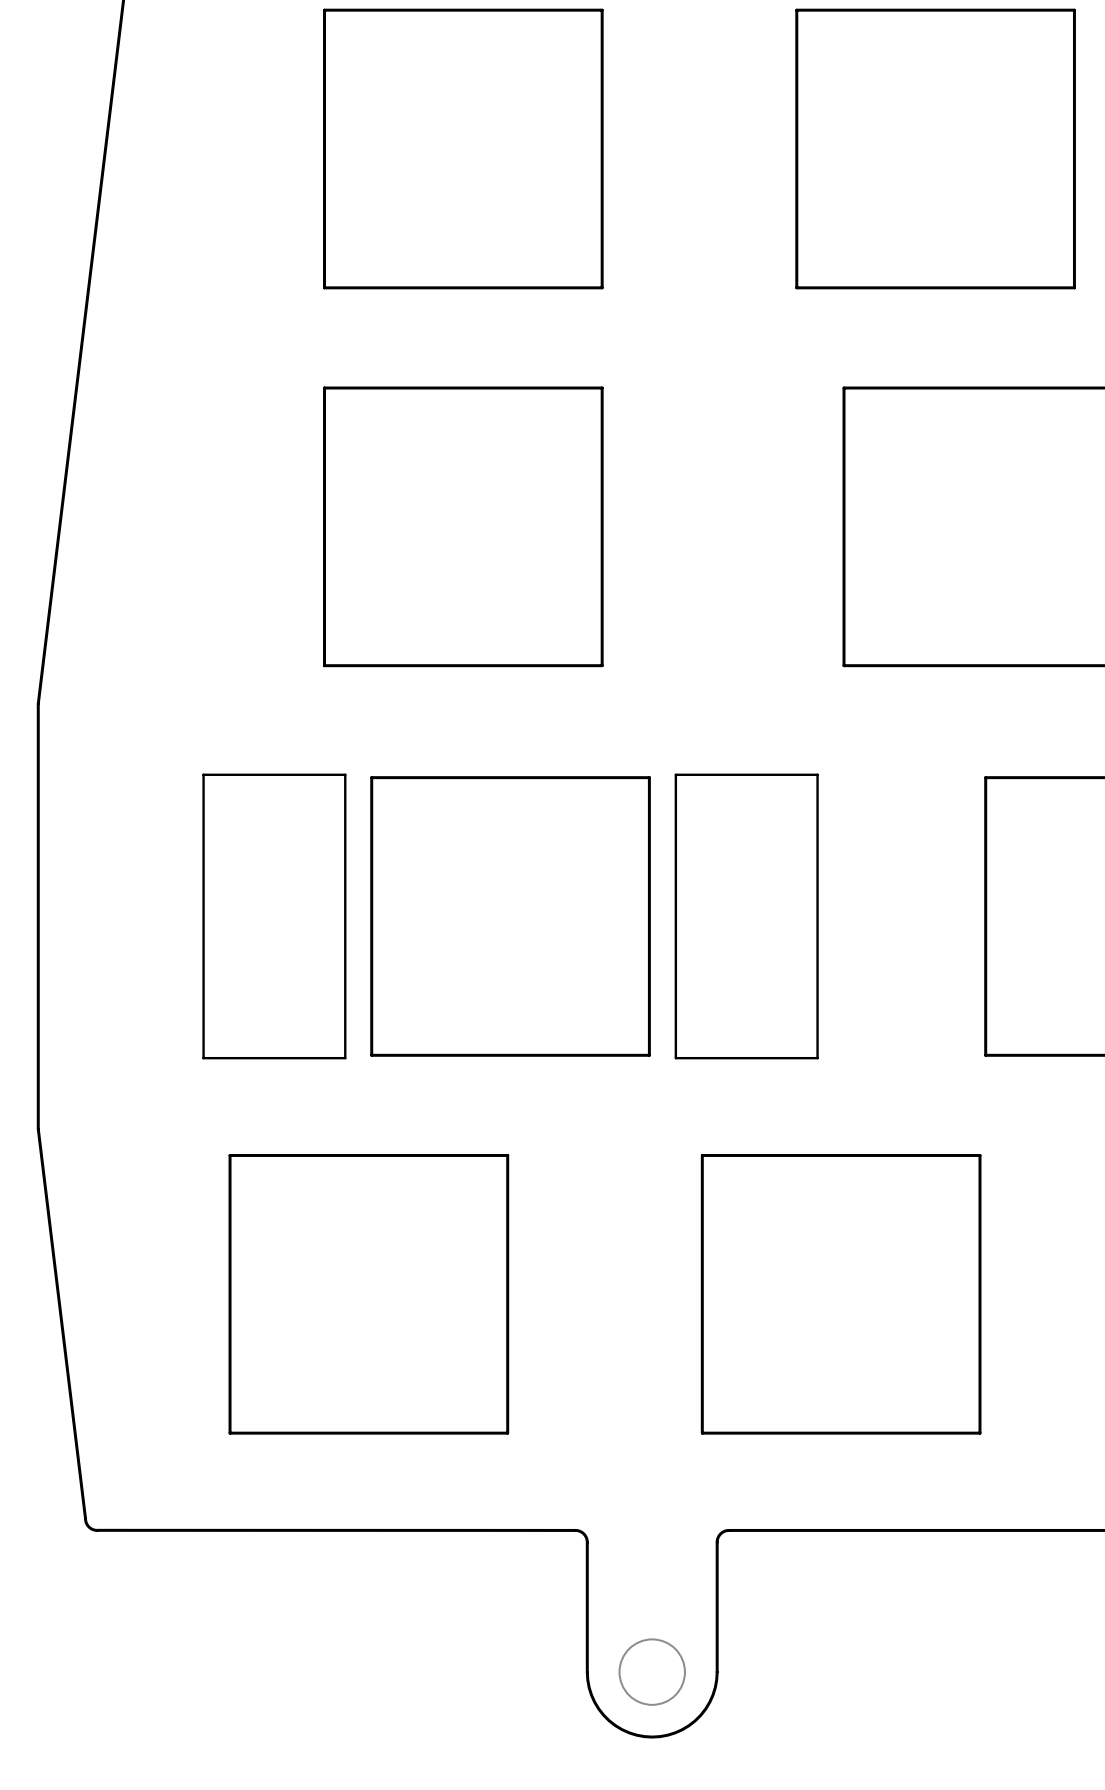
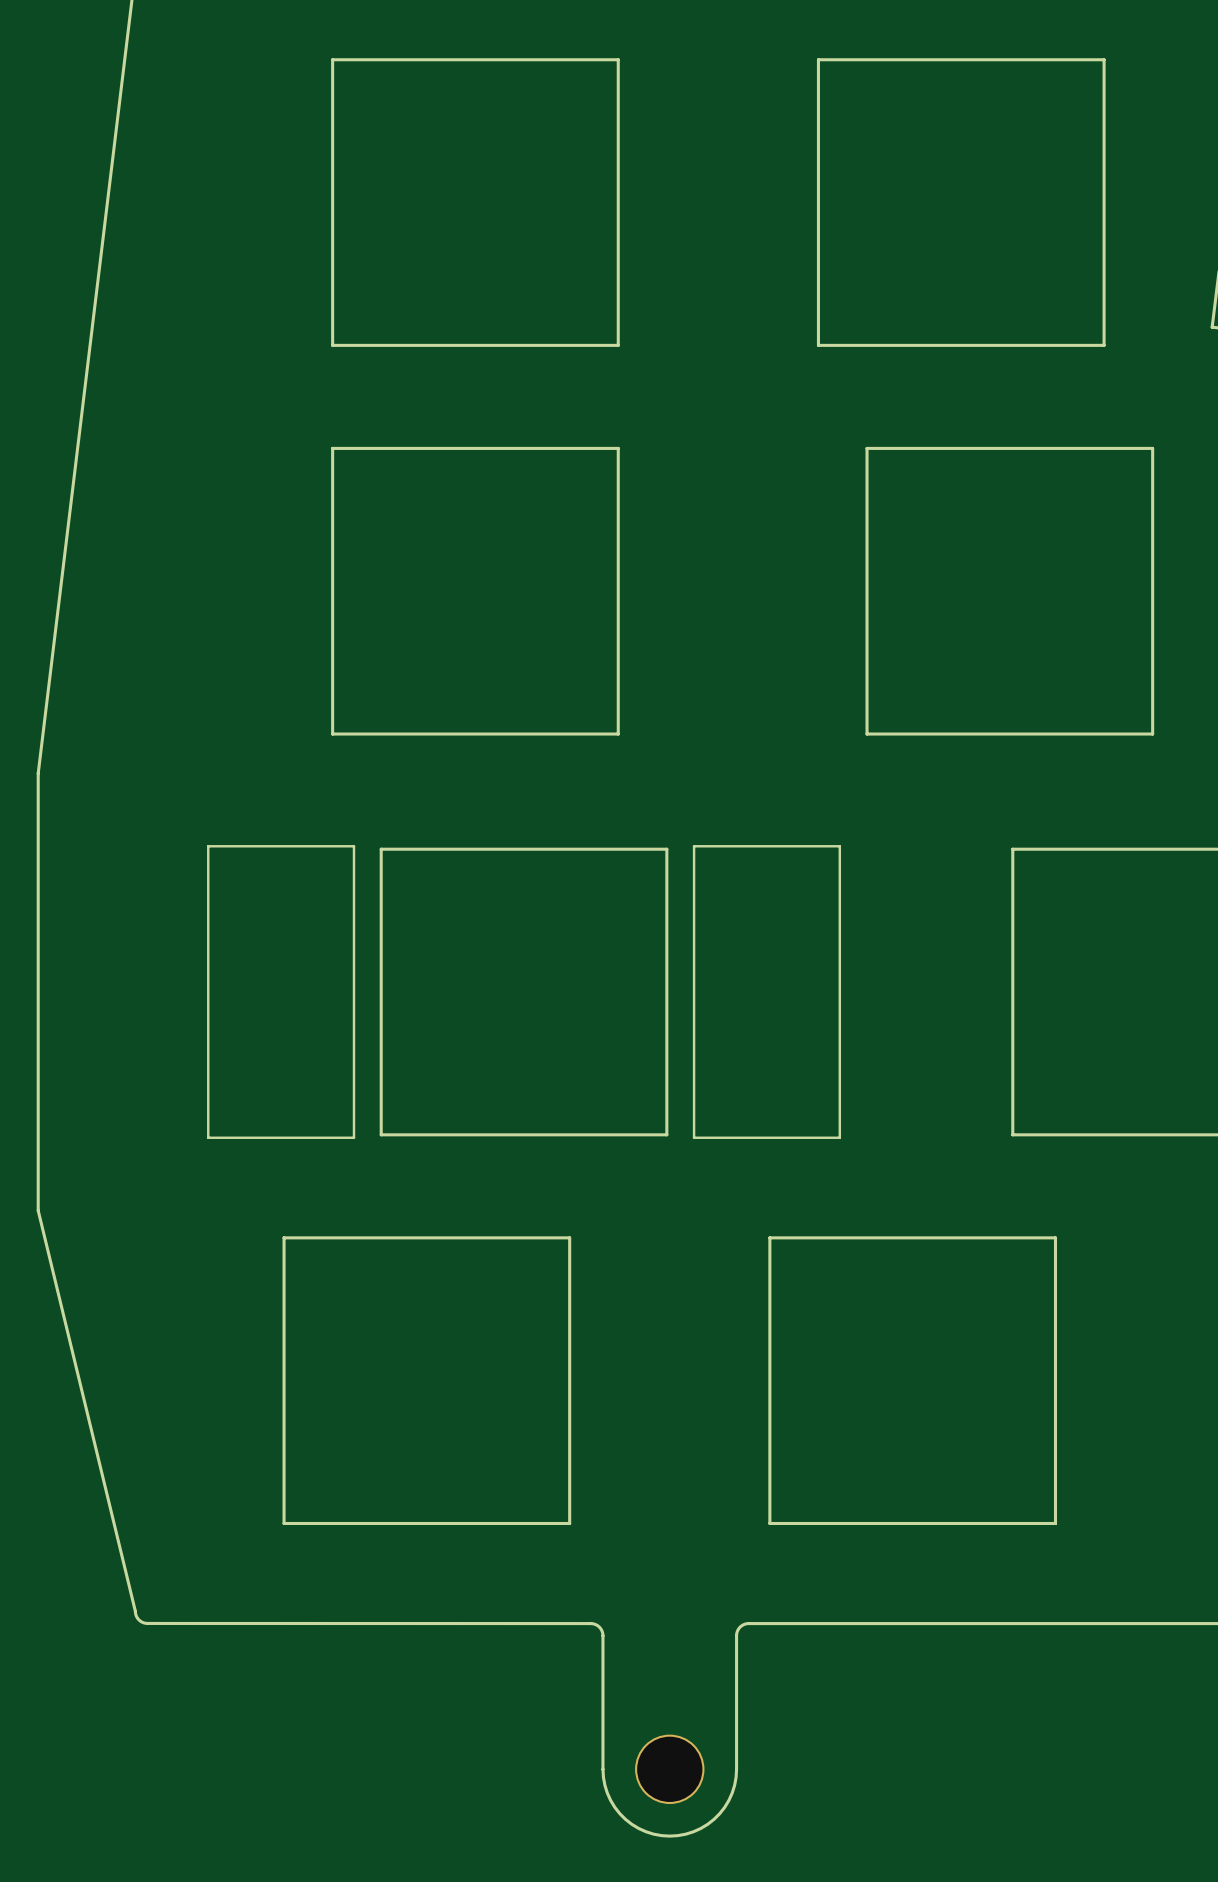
board edge: (38, 1129) (85, 1520) (90, 1528) (97, 1530) -> (38, 1210) (135, 1614) (140, 1620) (147, 1623)
drawing position: (368, 1294) -> (426, 1380)
drawing position: (841, 1294) -> (912, 1380)
board edge: (97, 1530) (144, 1530) -> none

